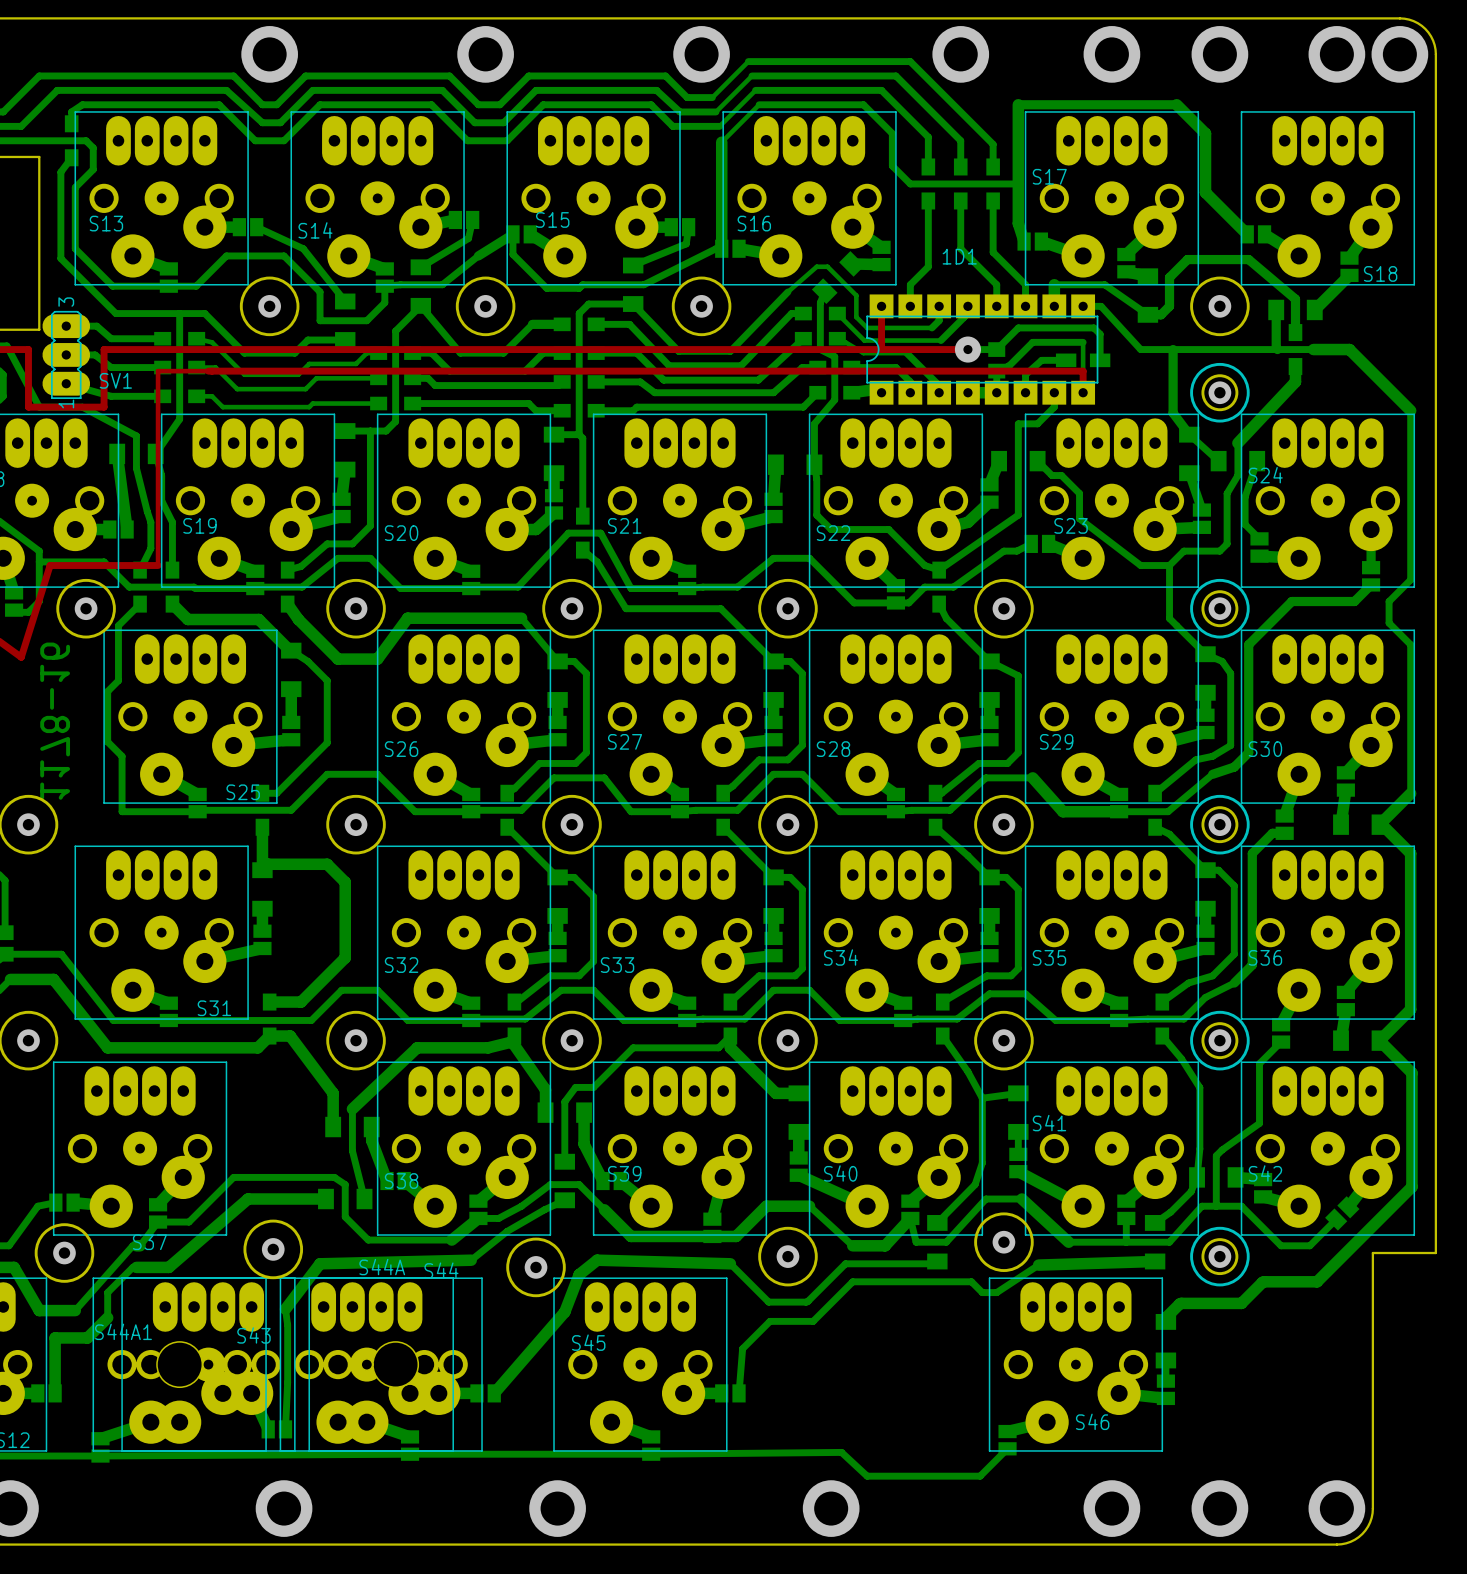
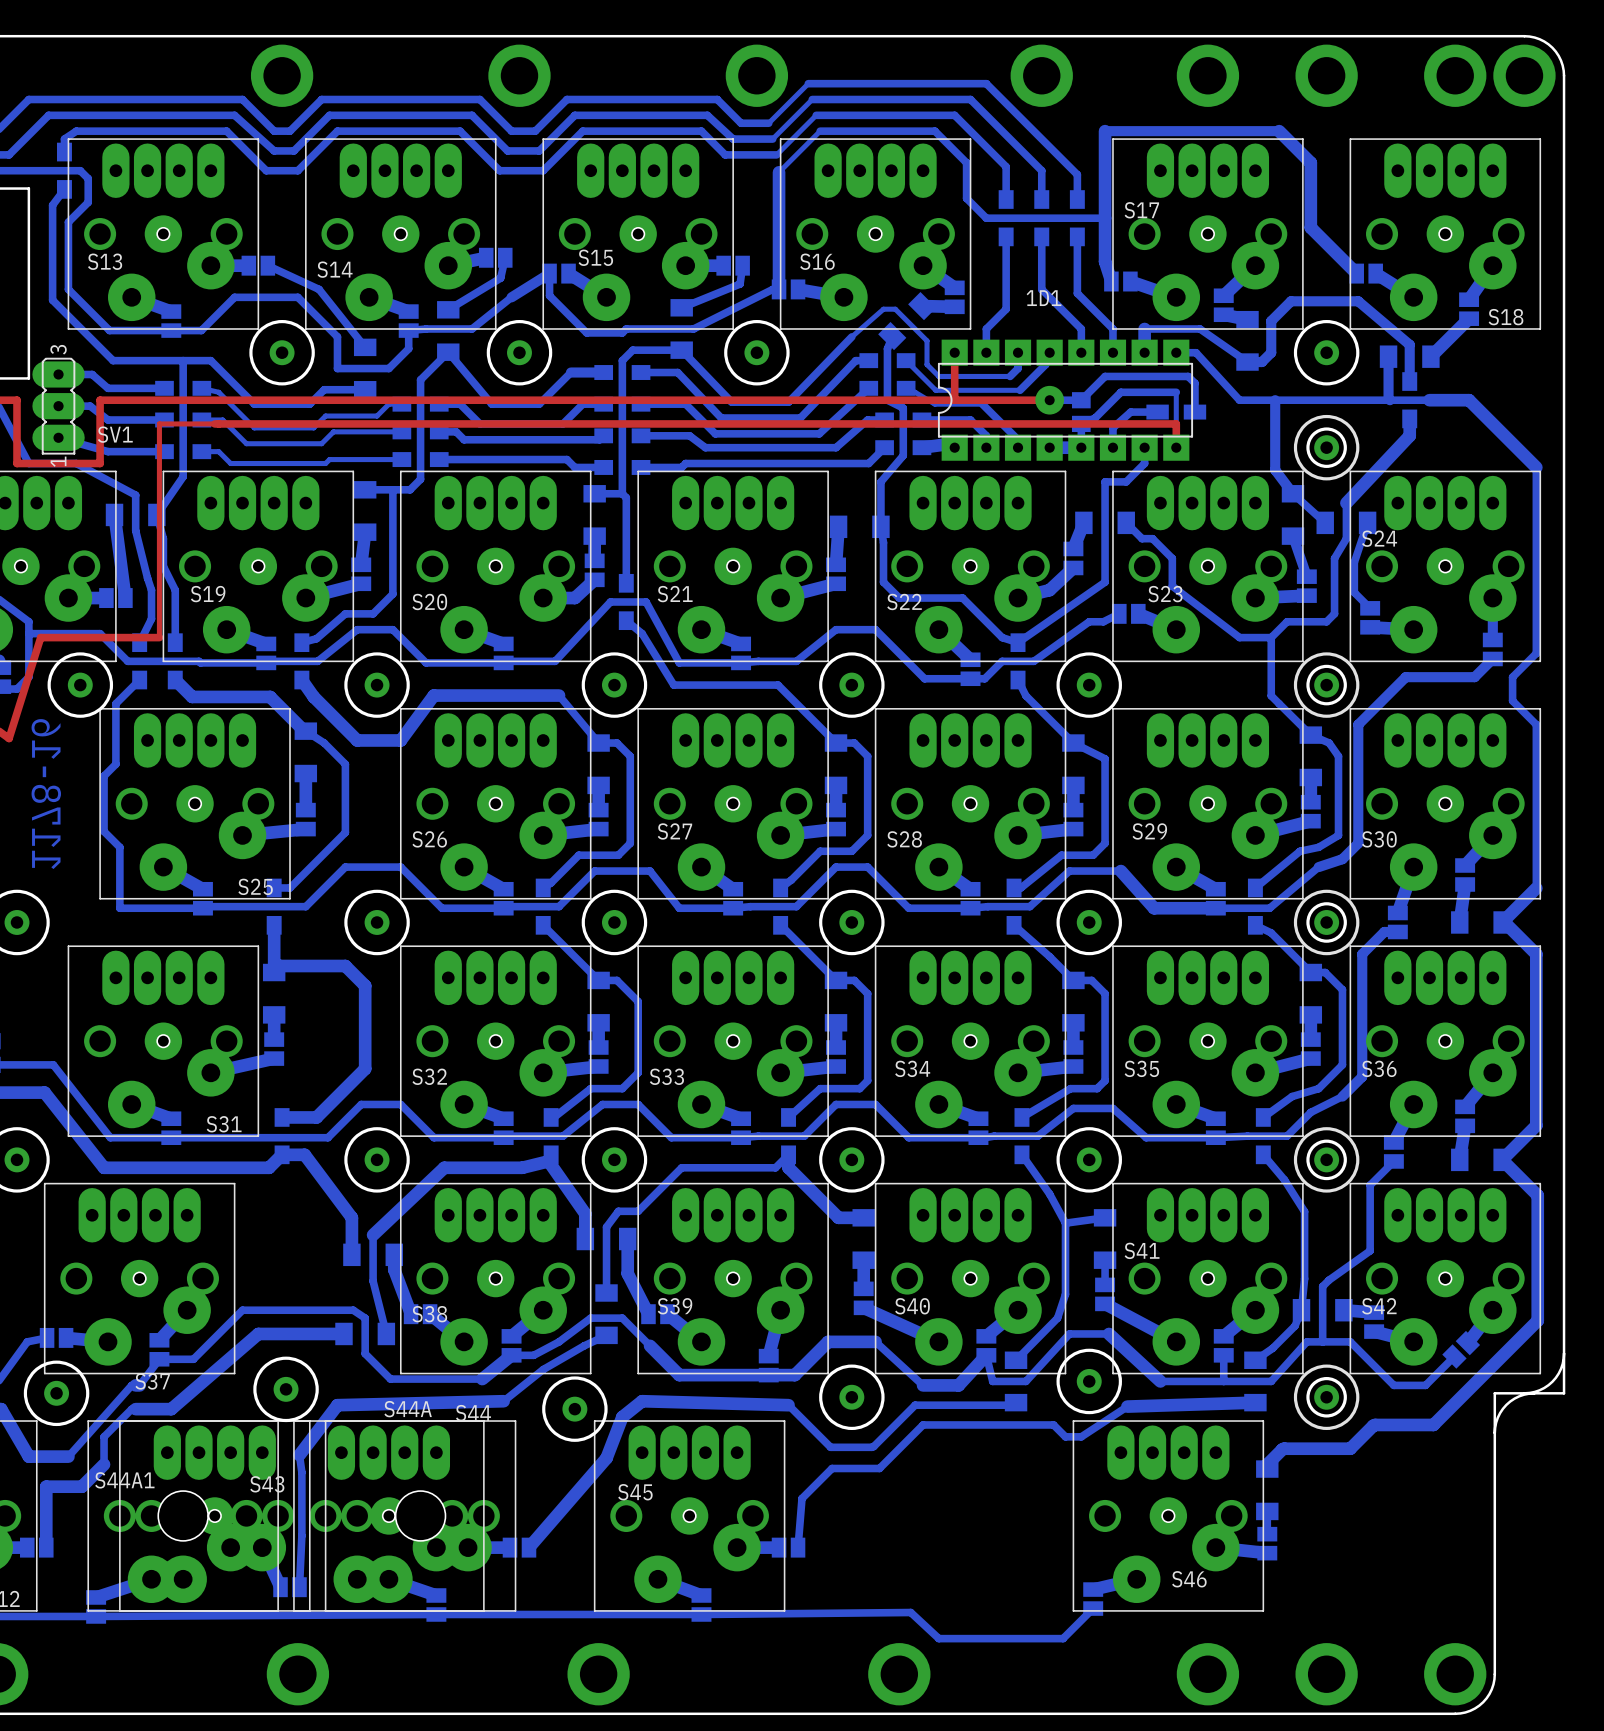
board edge: none -> (1564, 1353) (1561, 1368) (1552, 1381) (1539, 1390) (1524, 1393)
board edge: none -> (1534, 1393) (1519, 1396) (1506, 1404) (1497, 1417) (1494, 1432)

